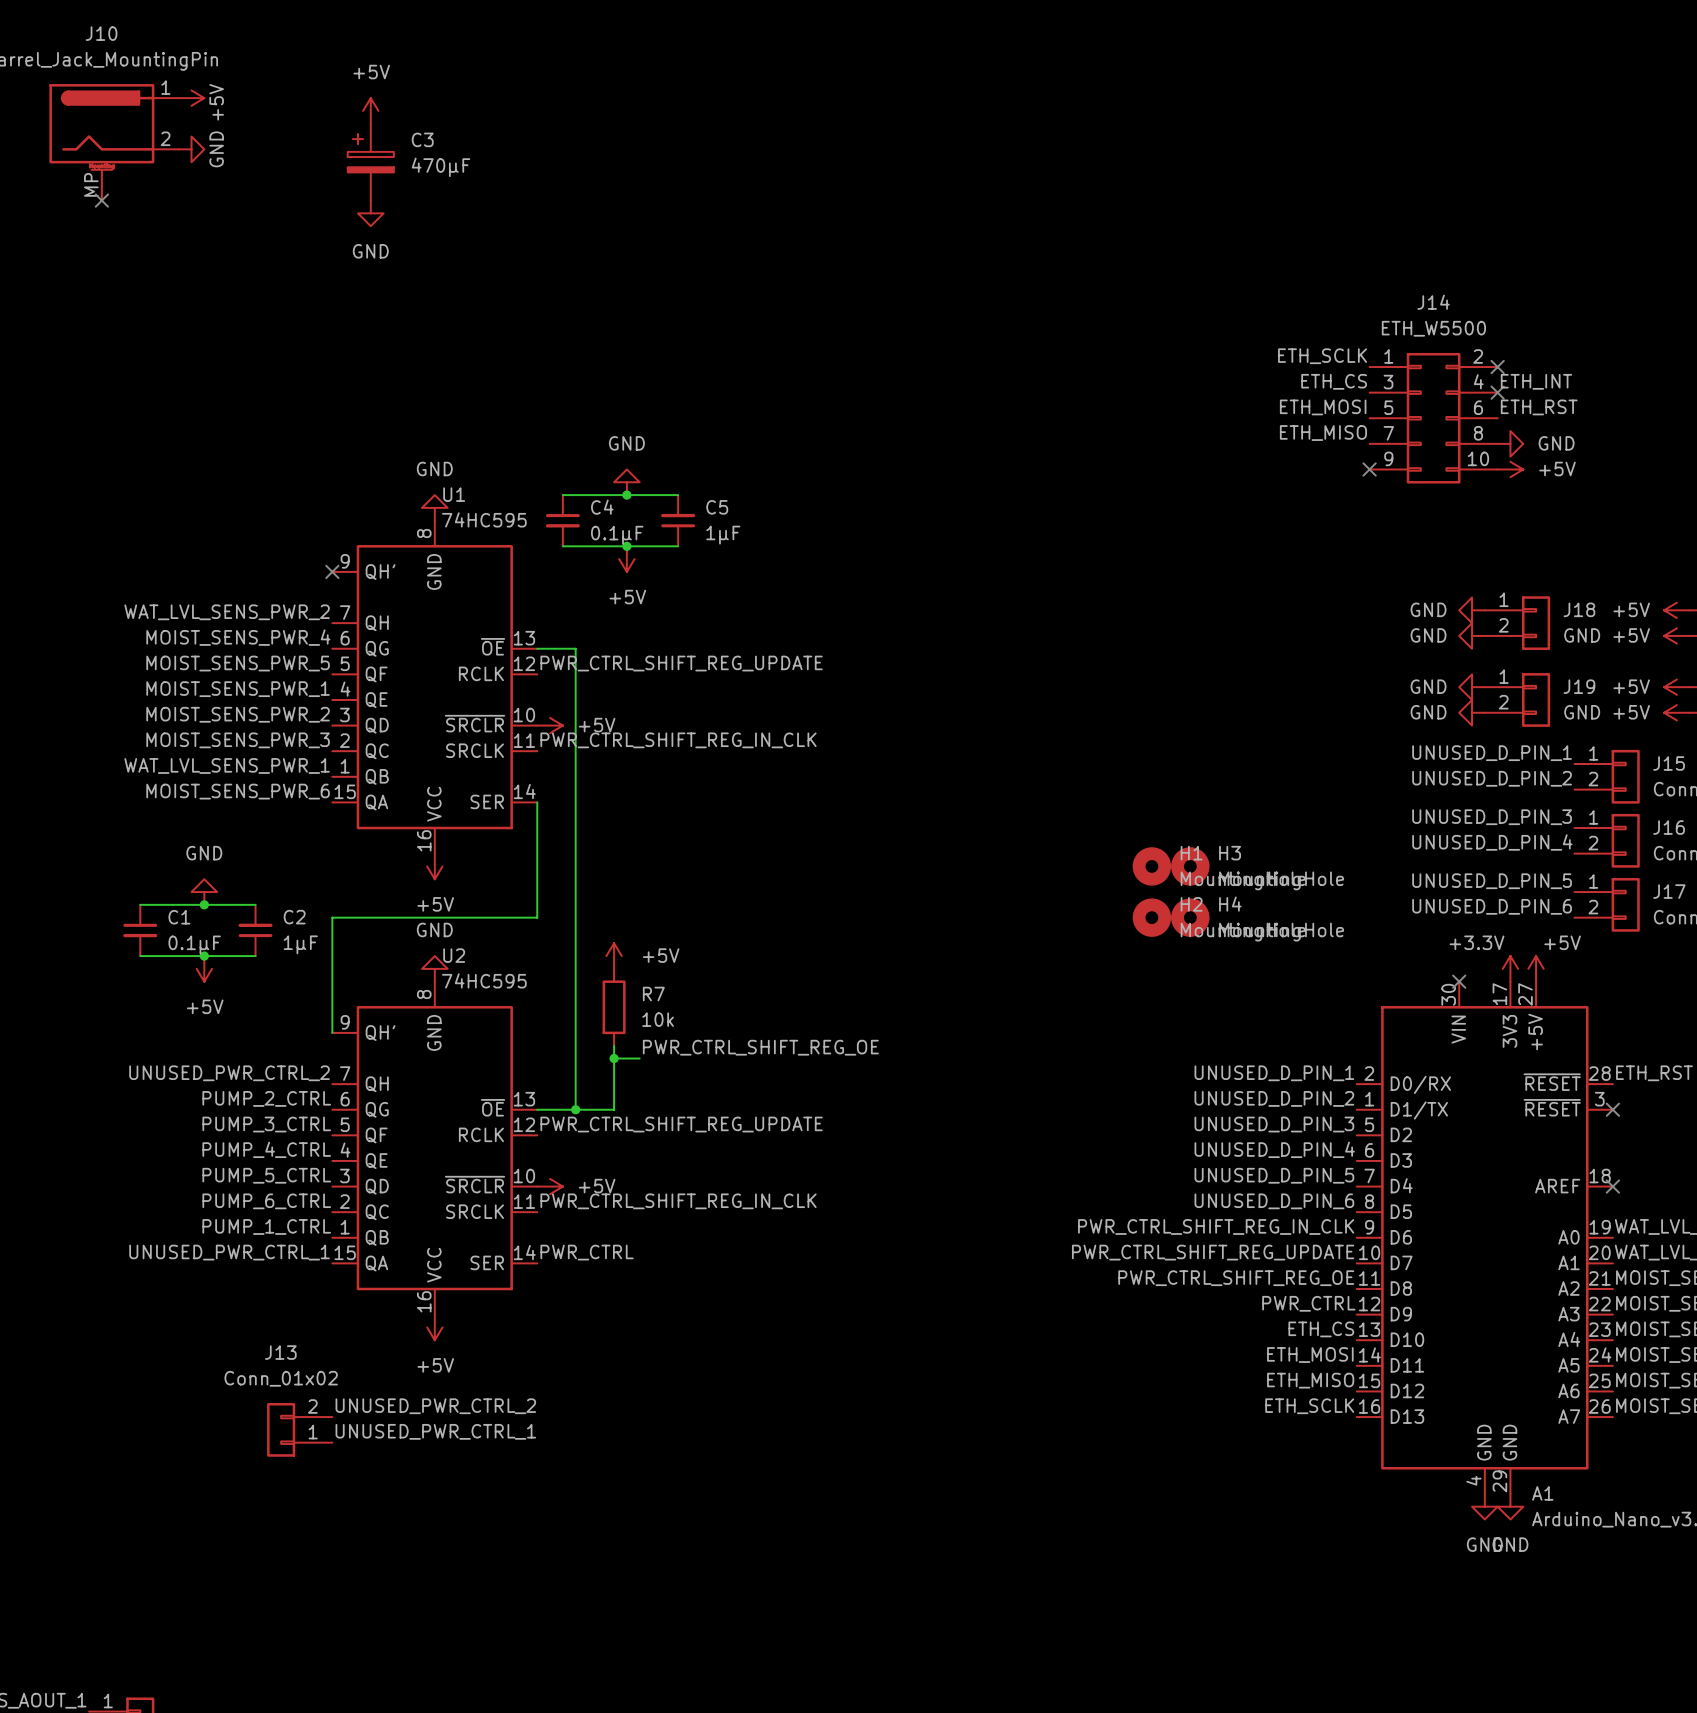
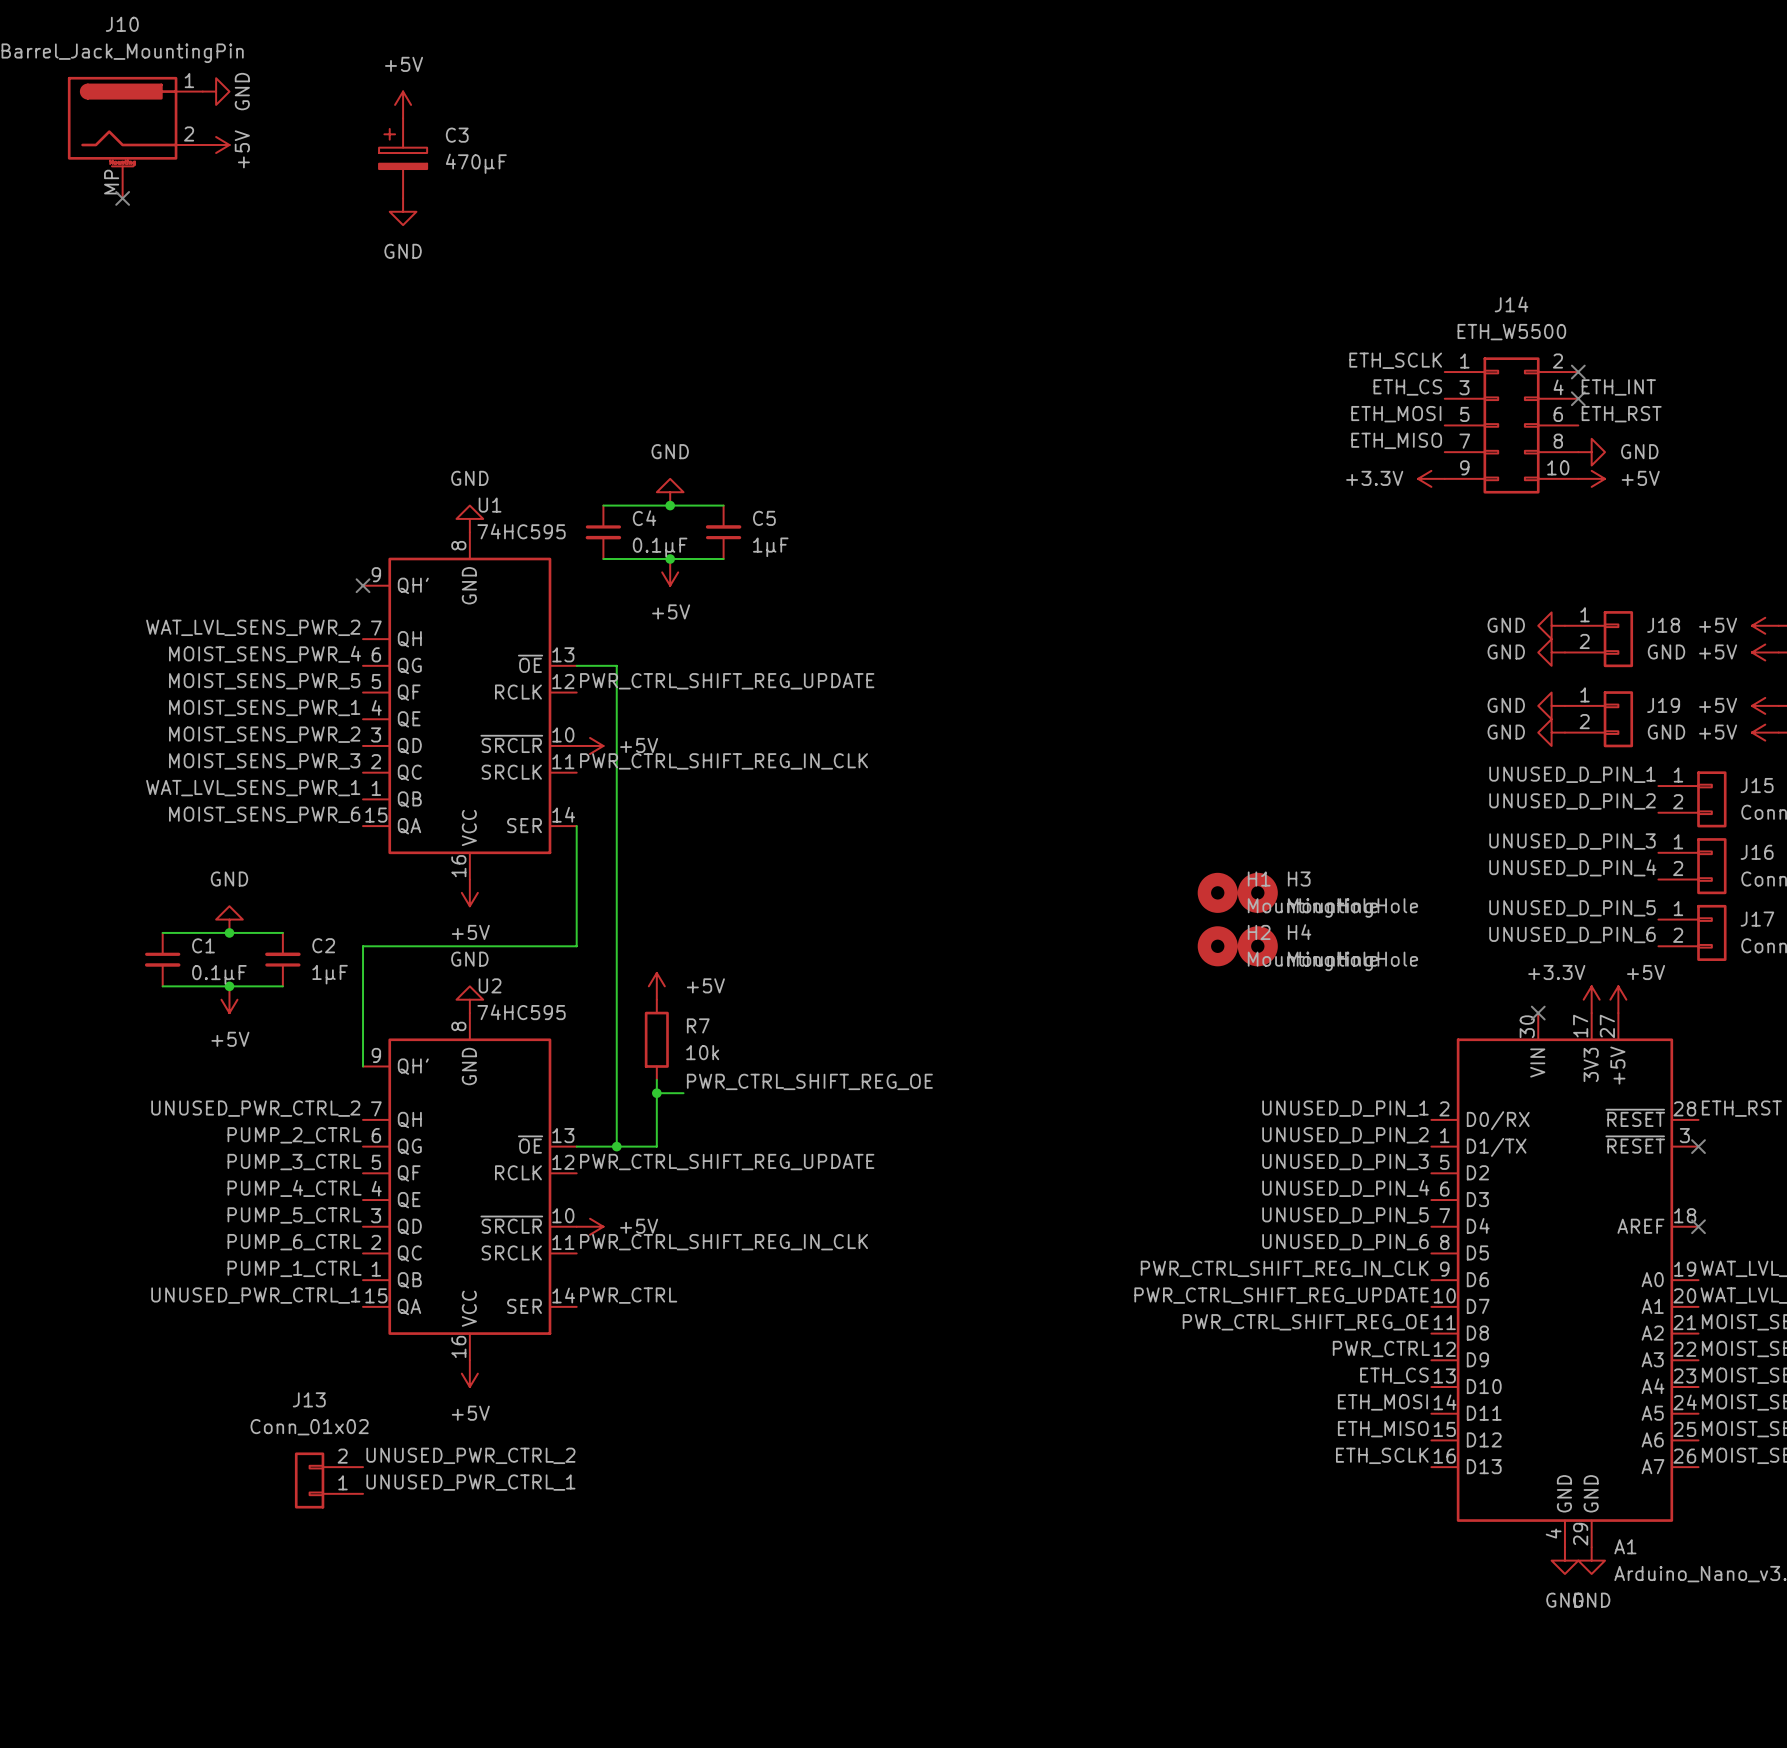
power symbol: +5V (191, 98) -> GND (216, 91)
power symbol: GND (191, 149) -> +5V (216, 144)
power symbol: none -> +3.3V (1431, 478)
no-connect mark: (1369, 469) -> none

